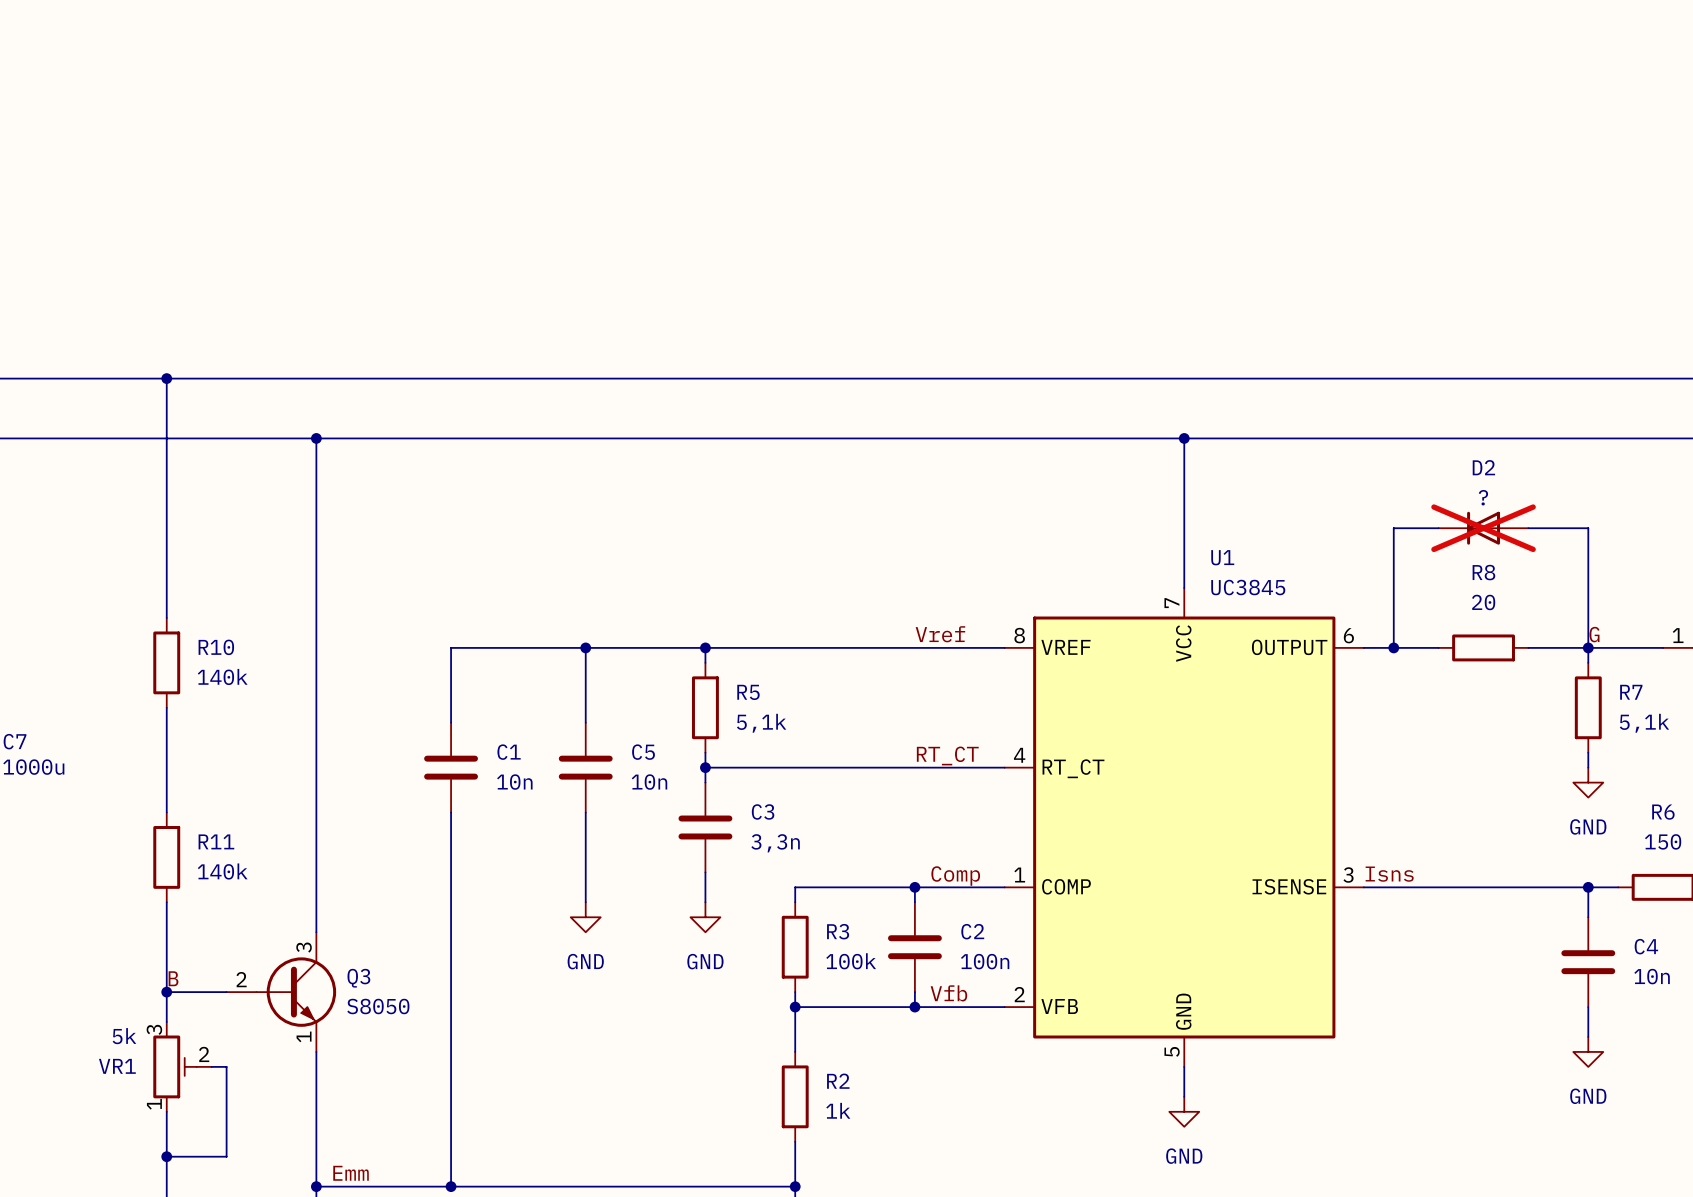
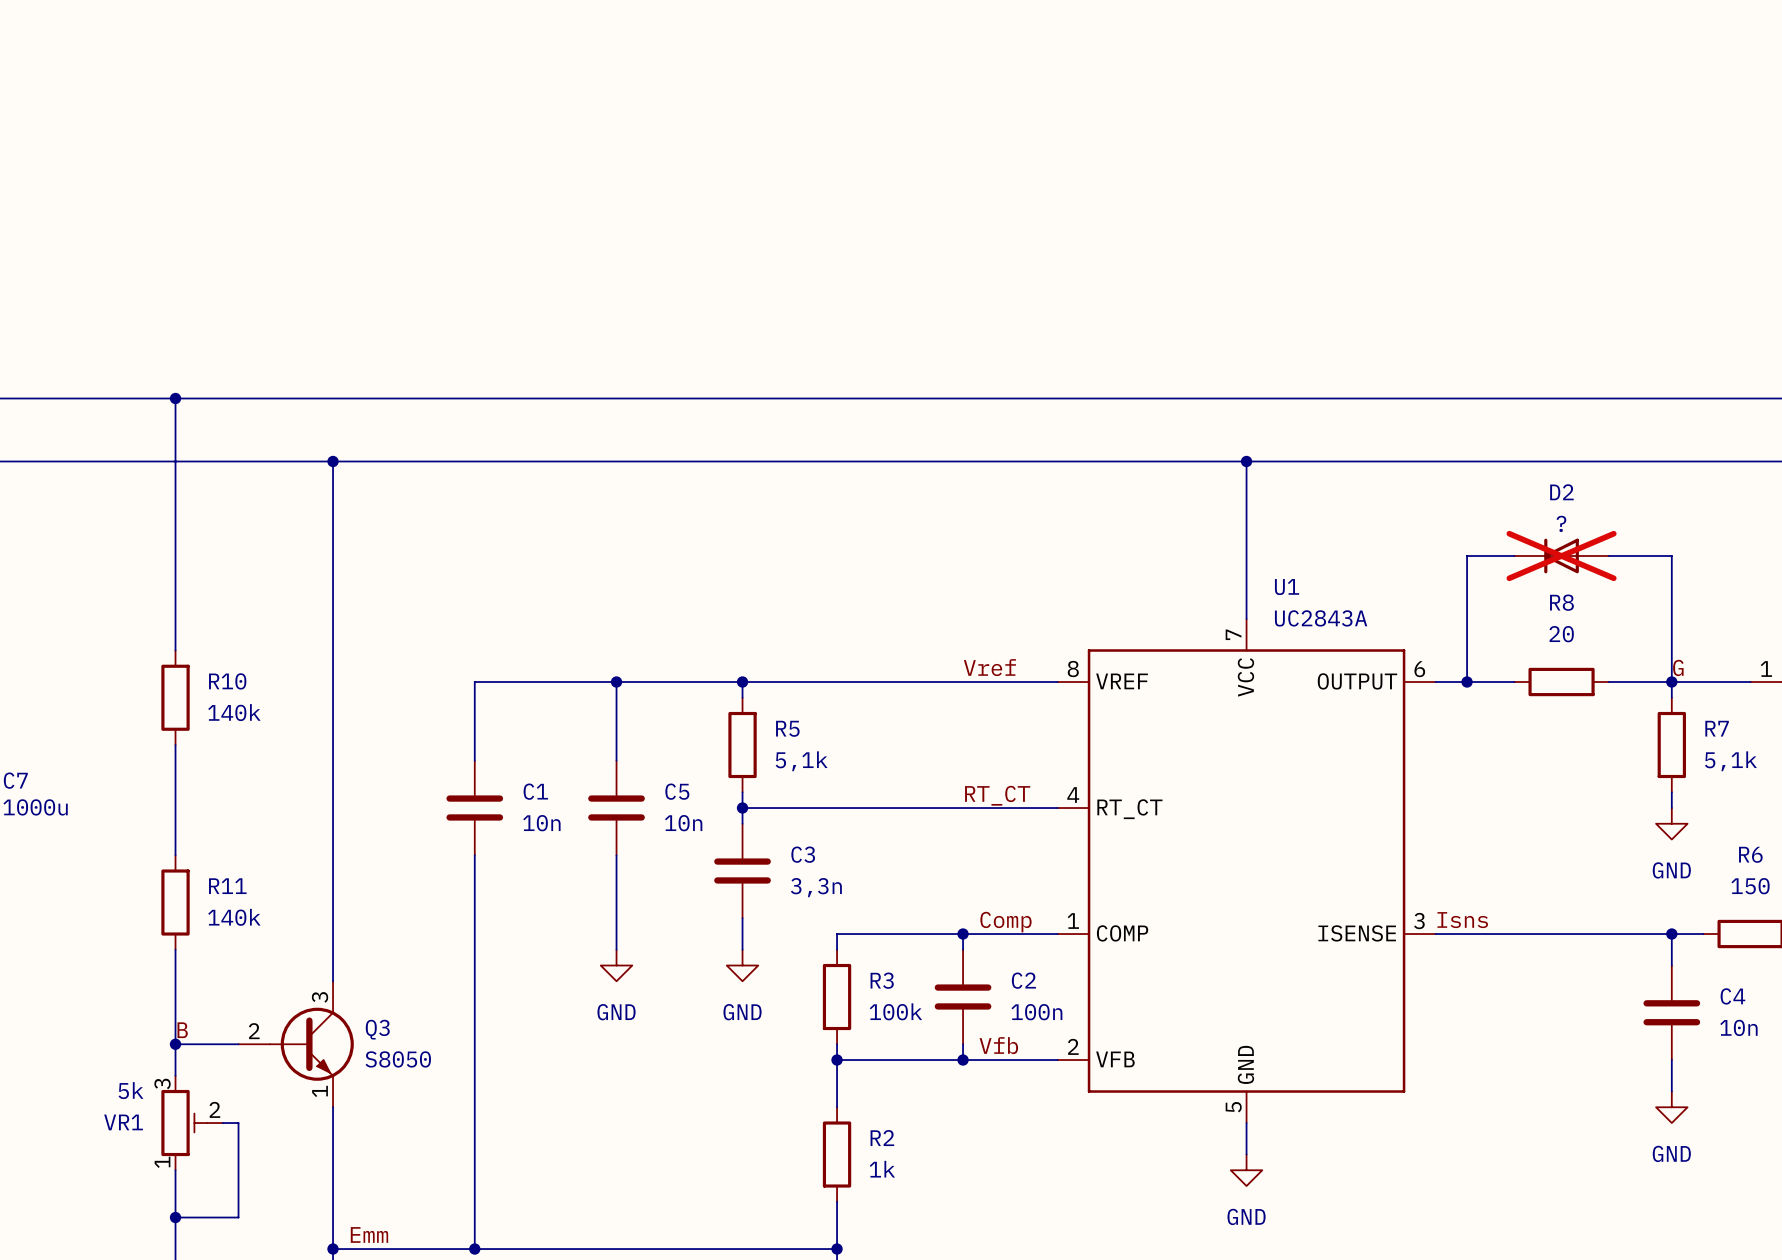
U1 value: UC3845 (1248, 587) -> UC2843A (1321, 618)
U1 symbol: [1004, 588, 1364, 1067] -> [1057, 619, 1436, 1124]

